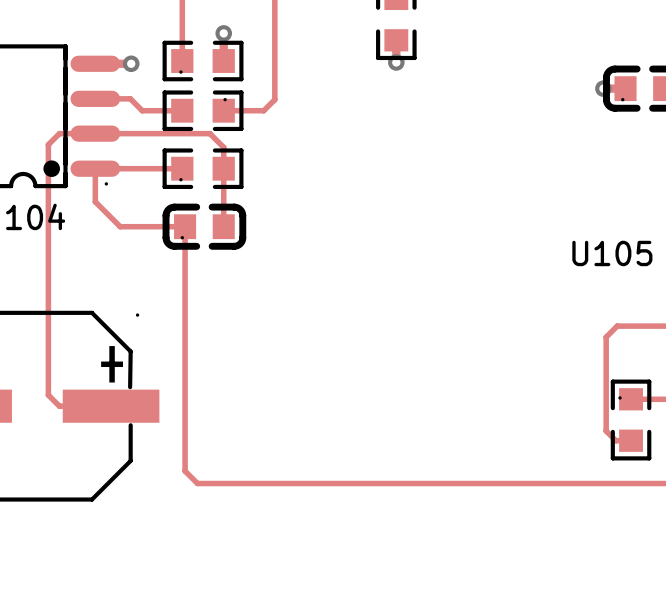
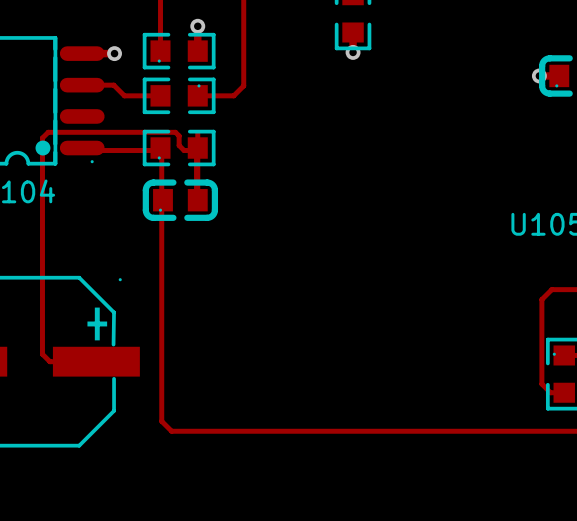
track: (223, 151) (223, 147) (209, 133) (59, 133) (48, 144) (48, 395) (51, 397) -> (196, 200) (197, 150) (184, 150) (179, 145) (179, 135) (175, 132) (48, 132) (42, 138) (42, 354)
track: (182, 168) (95, 168) (95, 201) (120, 226) (185, 226) (185, 471) (197, 483) -> (82, 148) (84, 150) (161, 151) (161, 421) (171, 431) (174, 431)

